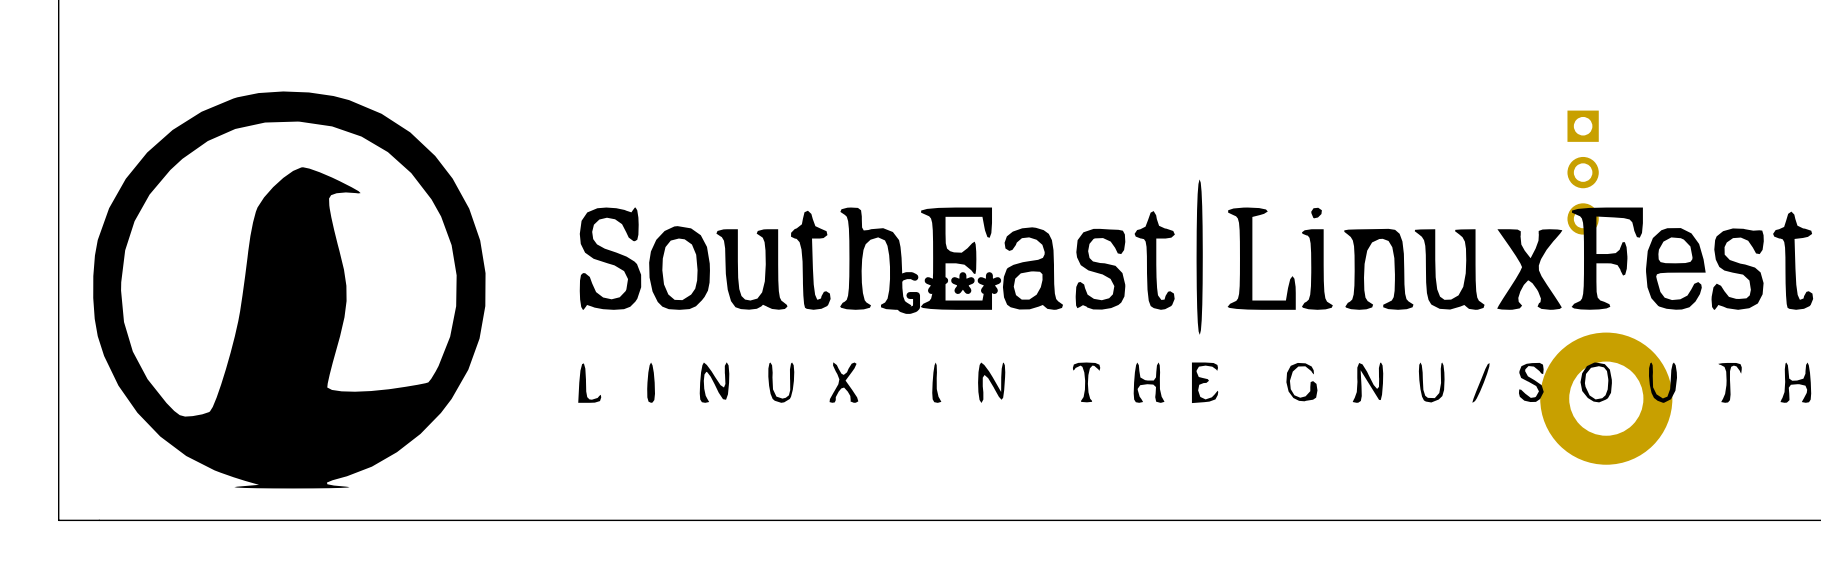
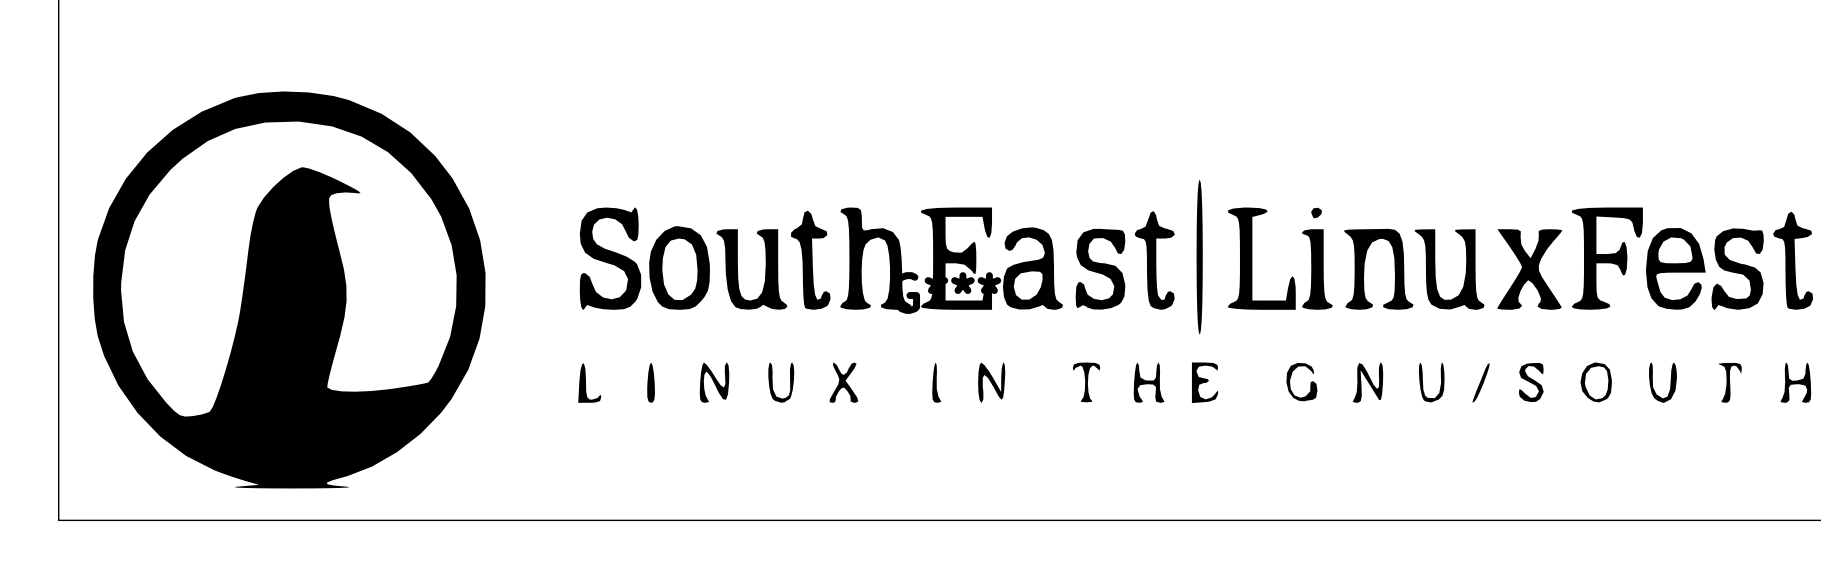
part: (1583, 172) -> none
part: (1606, 398) -> none

